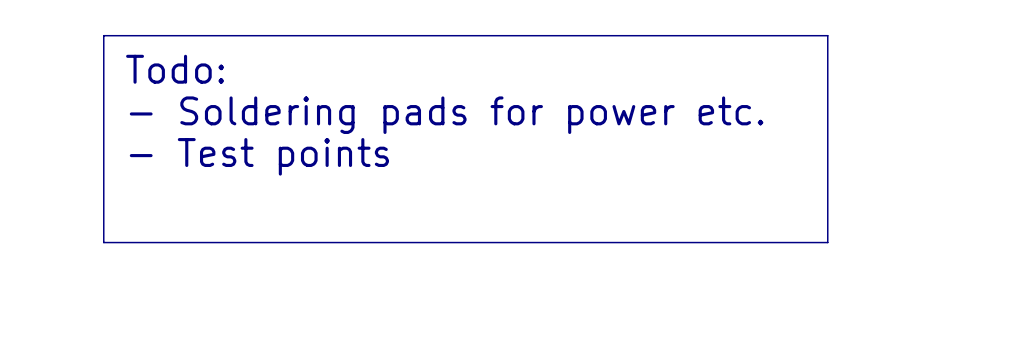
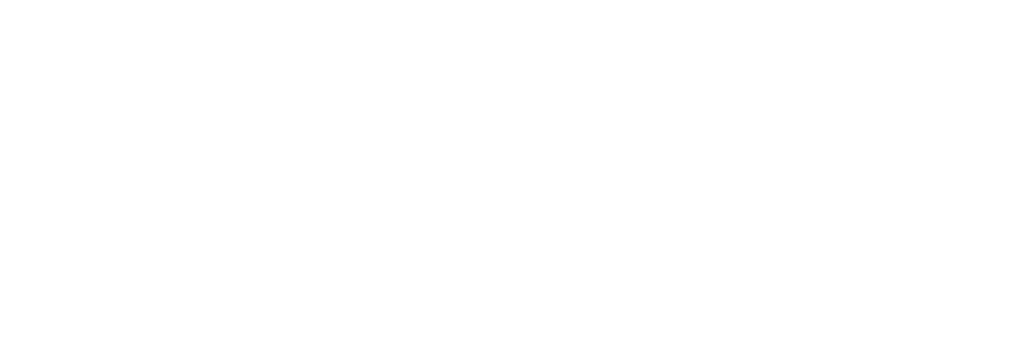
line: (103, 35) (827, 35) (827, 242) (103, 242) (103, 35) -> none
text: Todo: (175, 69) -> none
text: - Soldering pads for power etc. (446, 115) -> none
text: - Test points (259, 156) -> none

